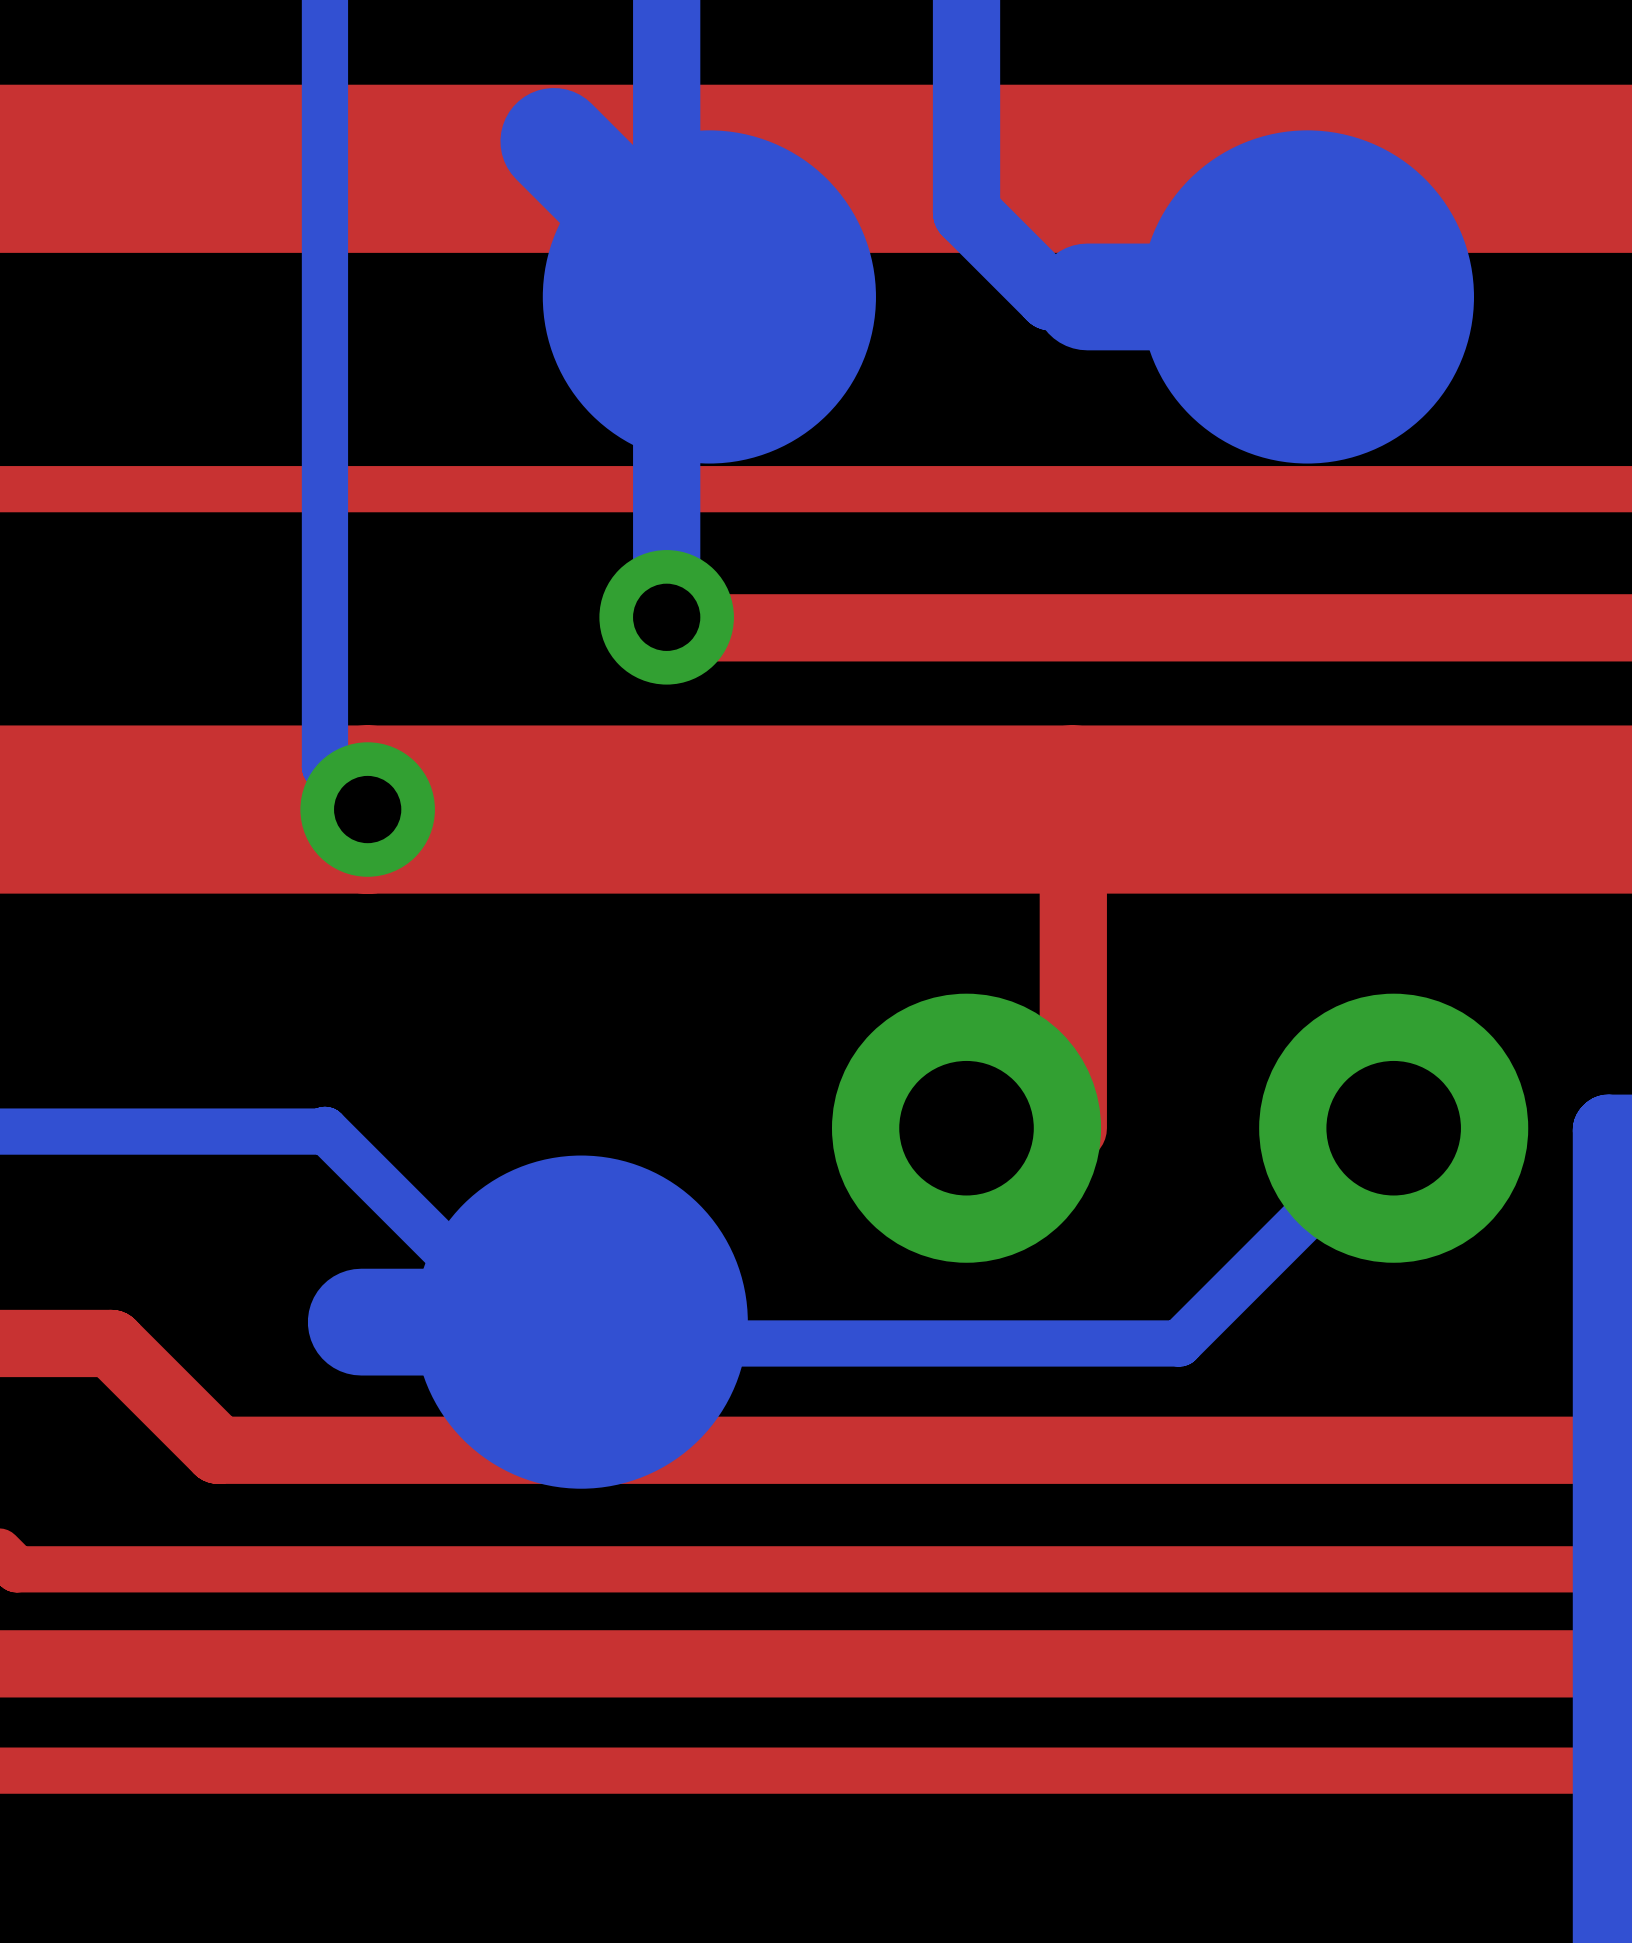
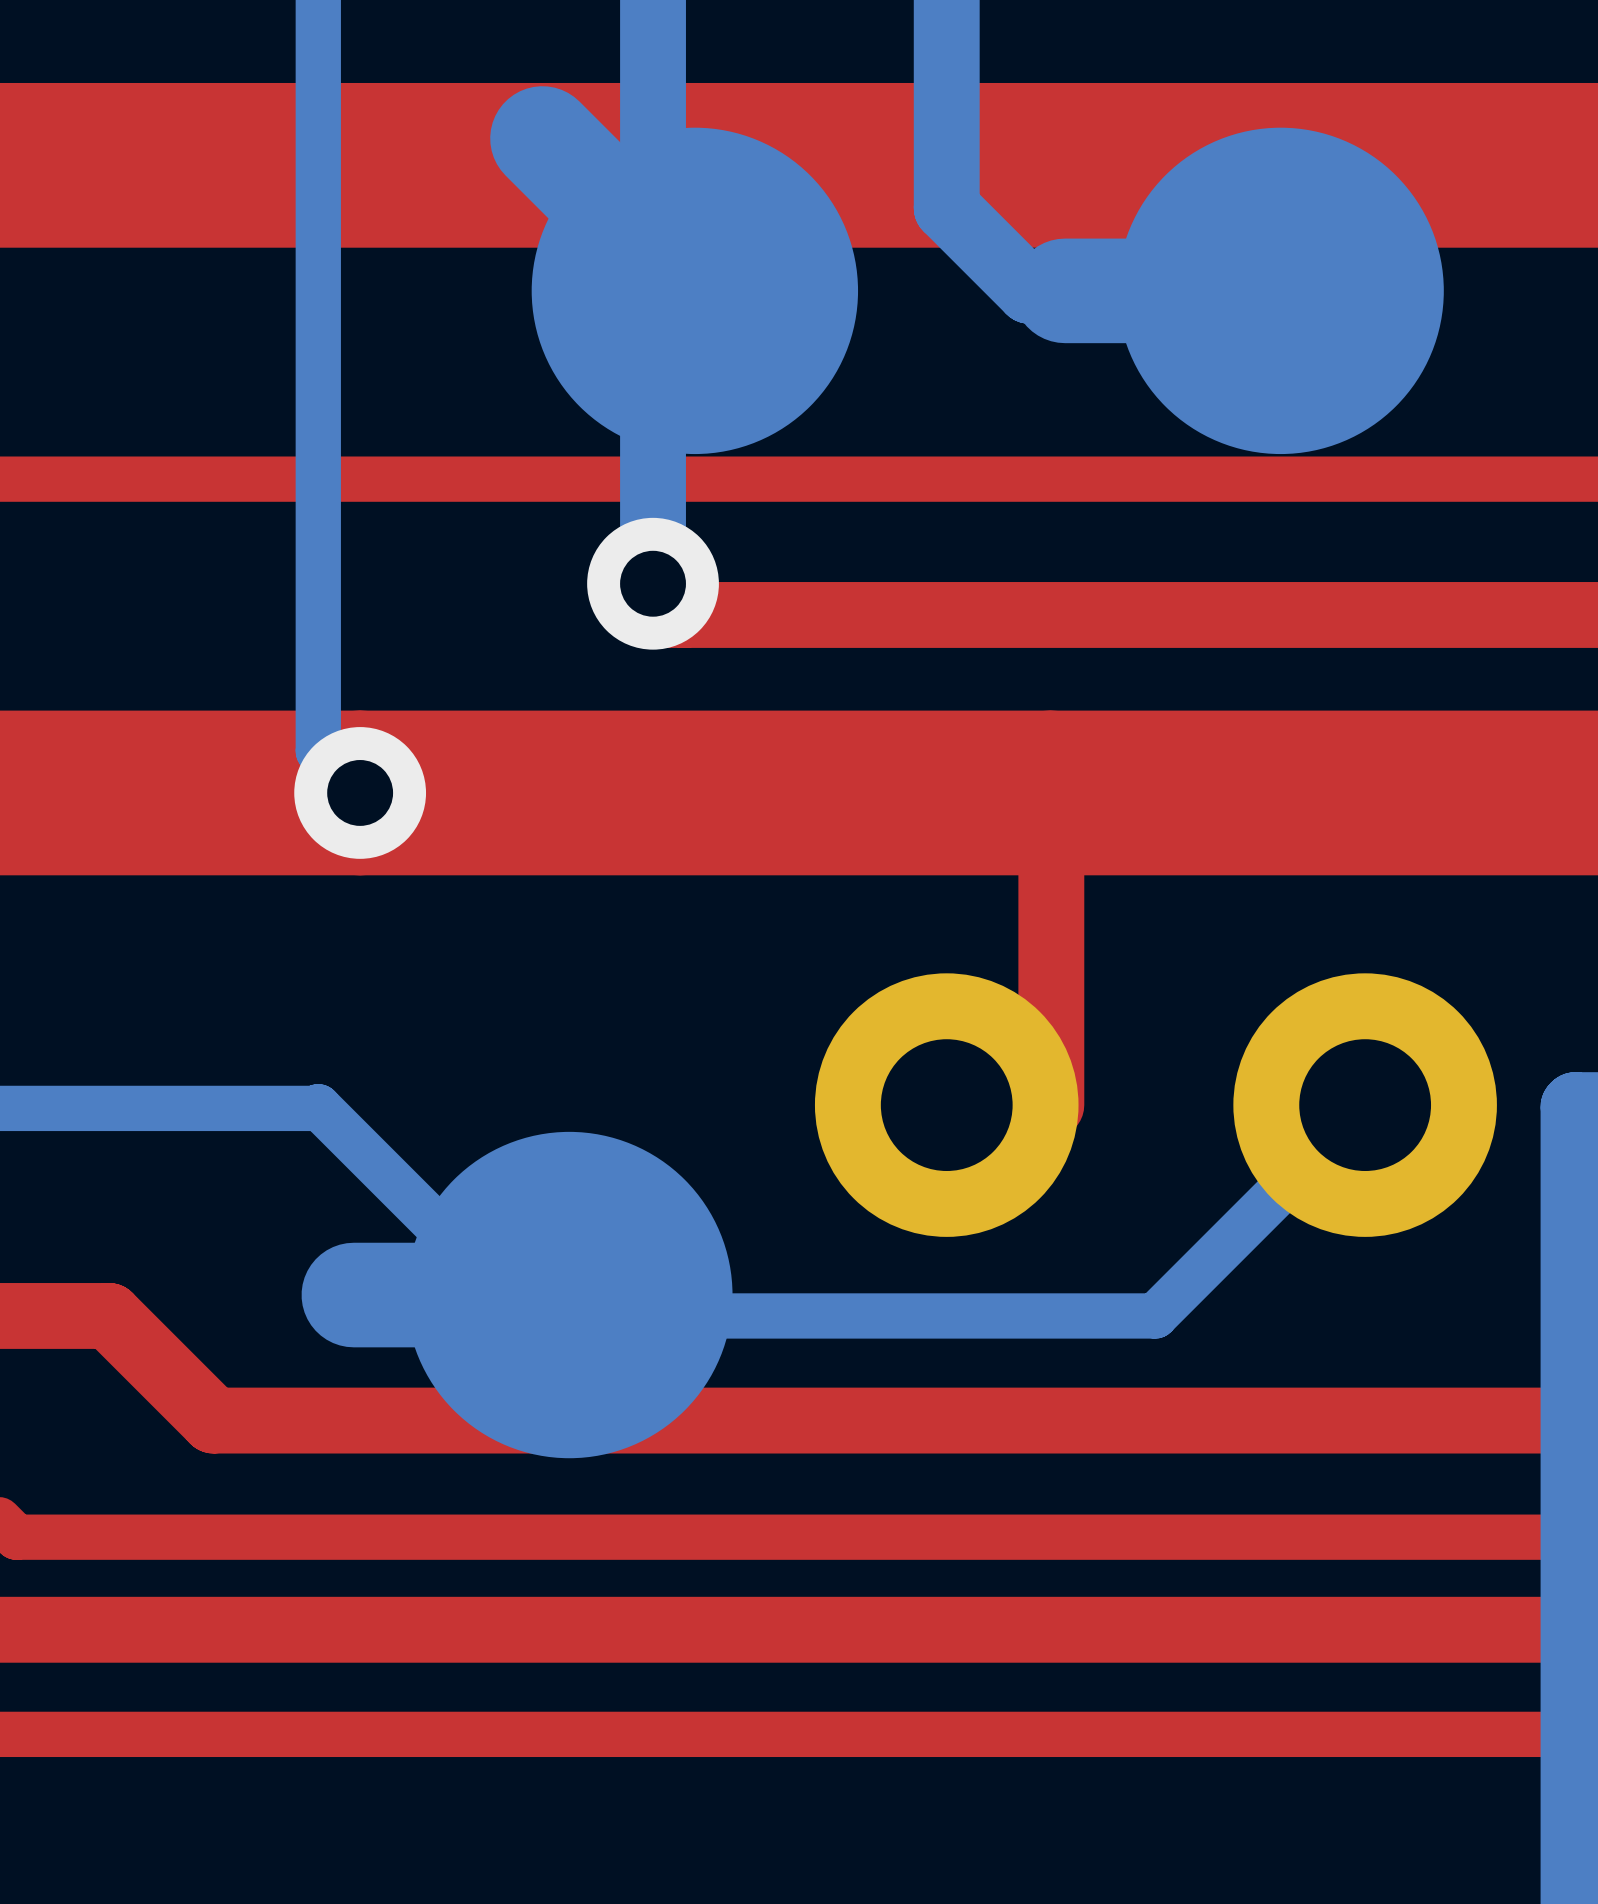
via position: (666, 617) -> (653, 583)

